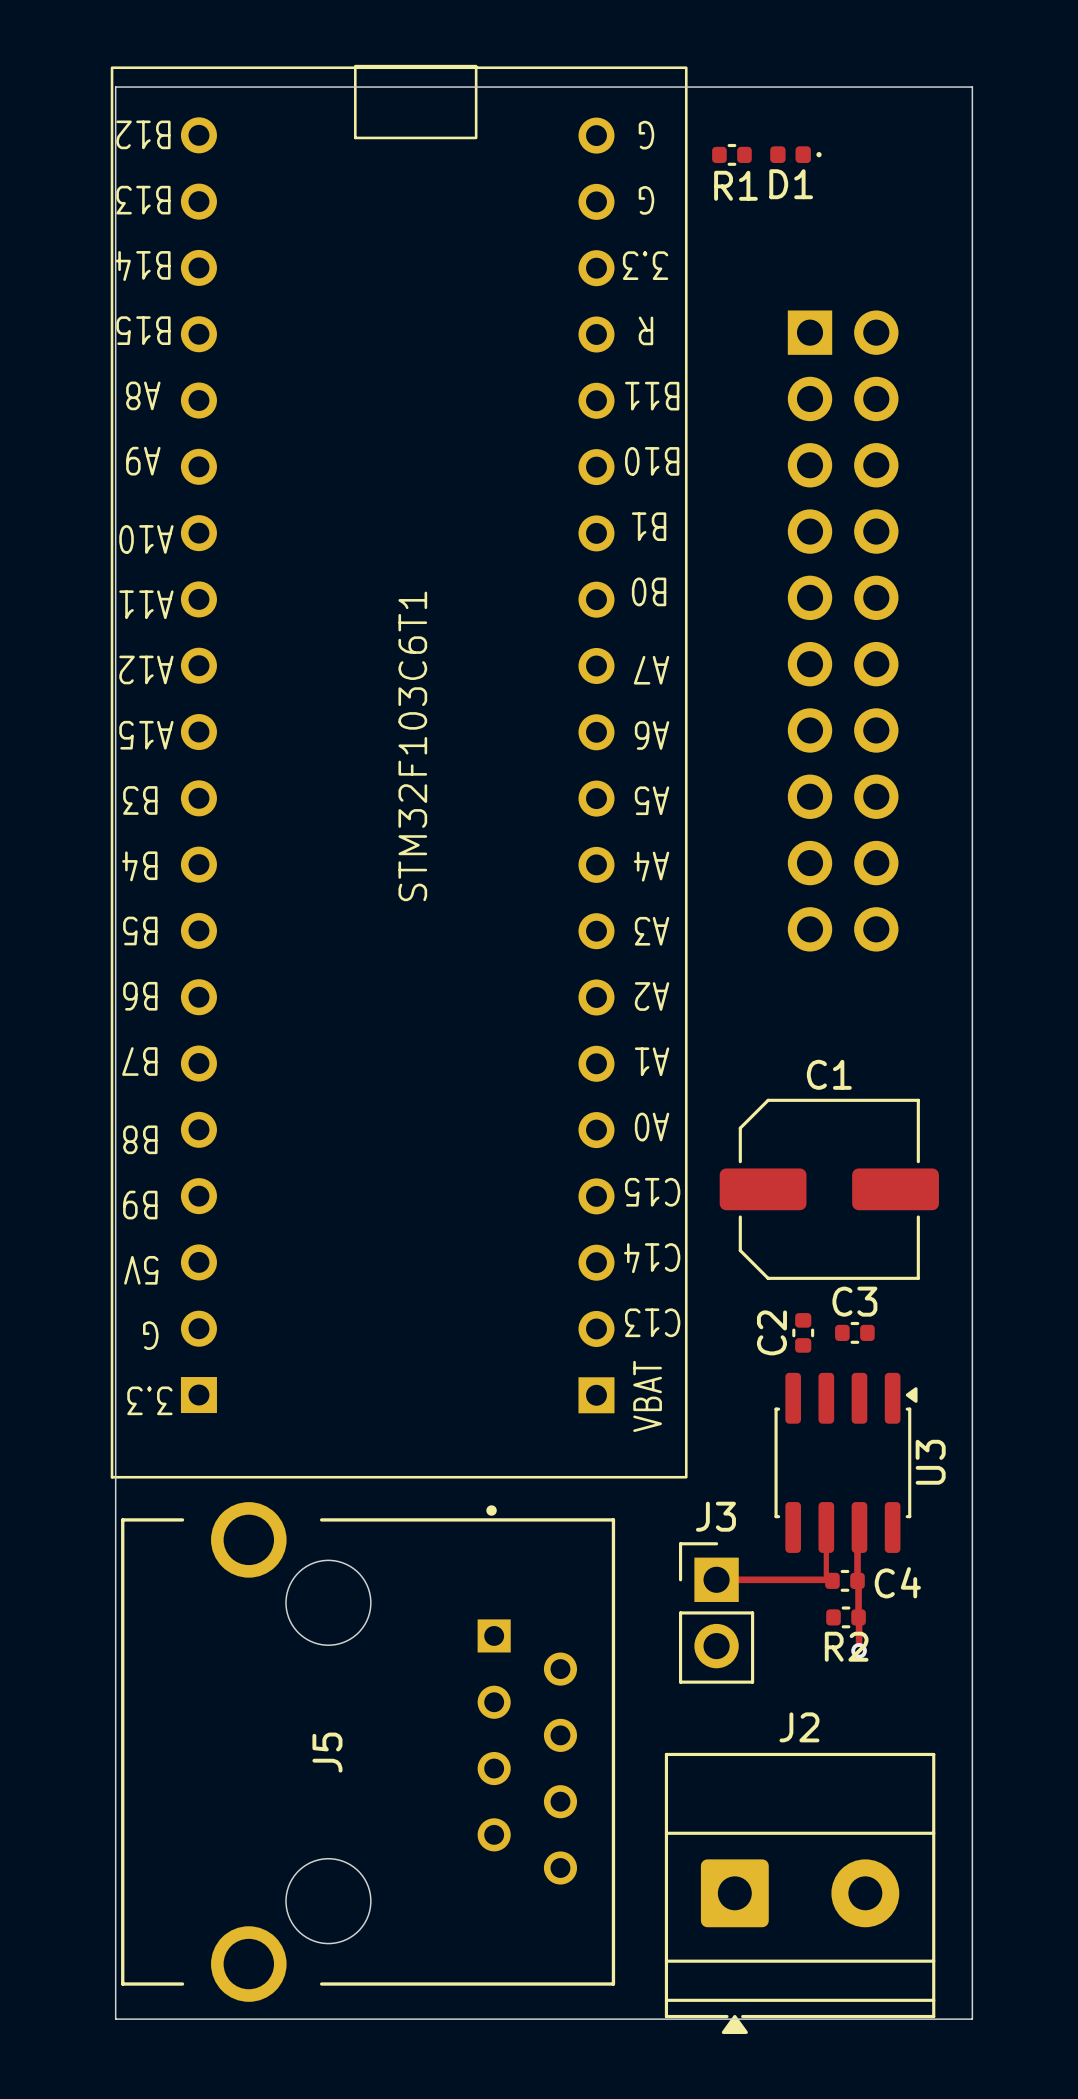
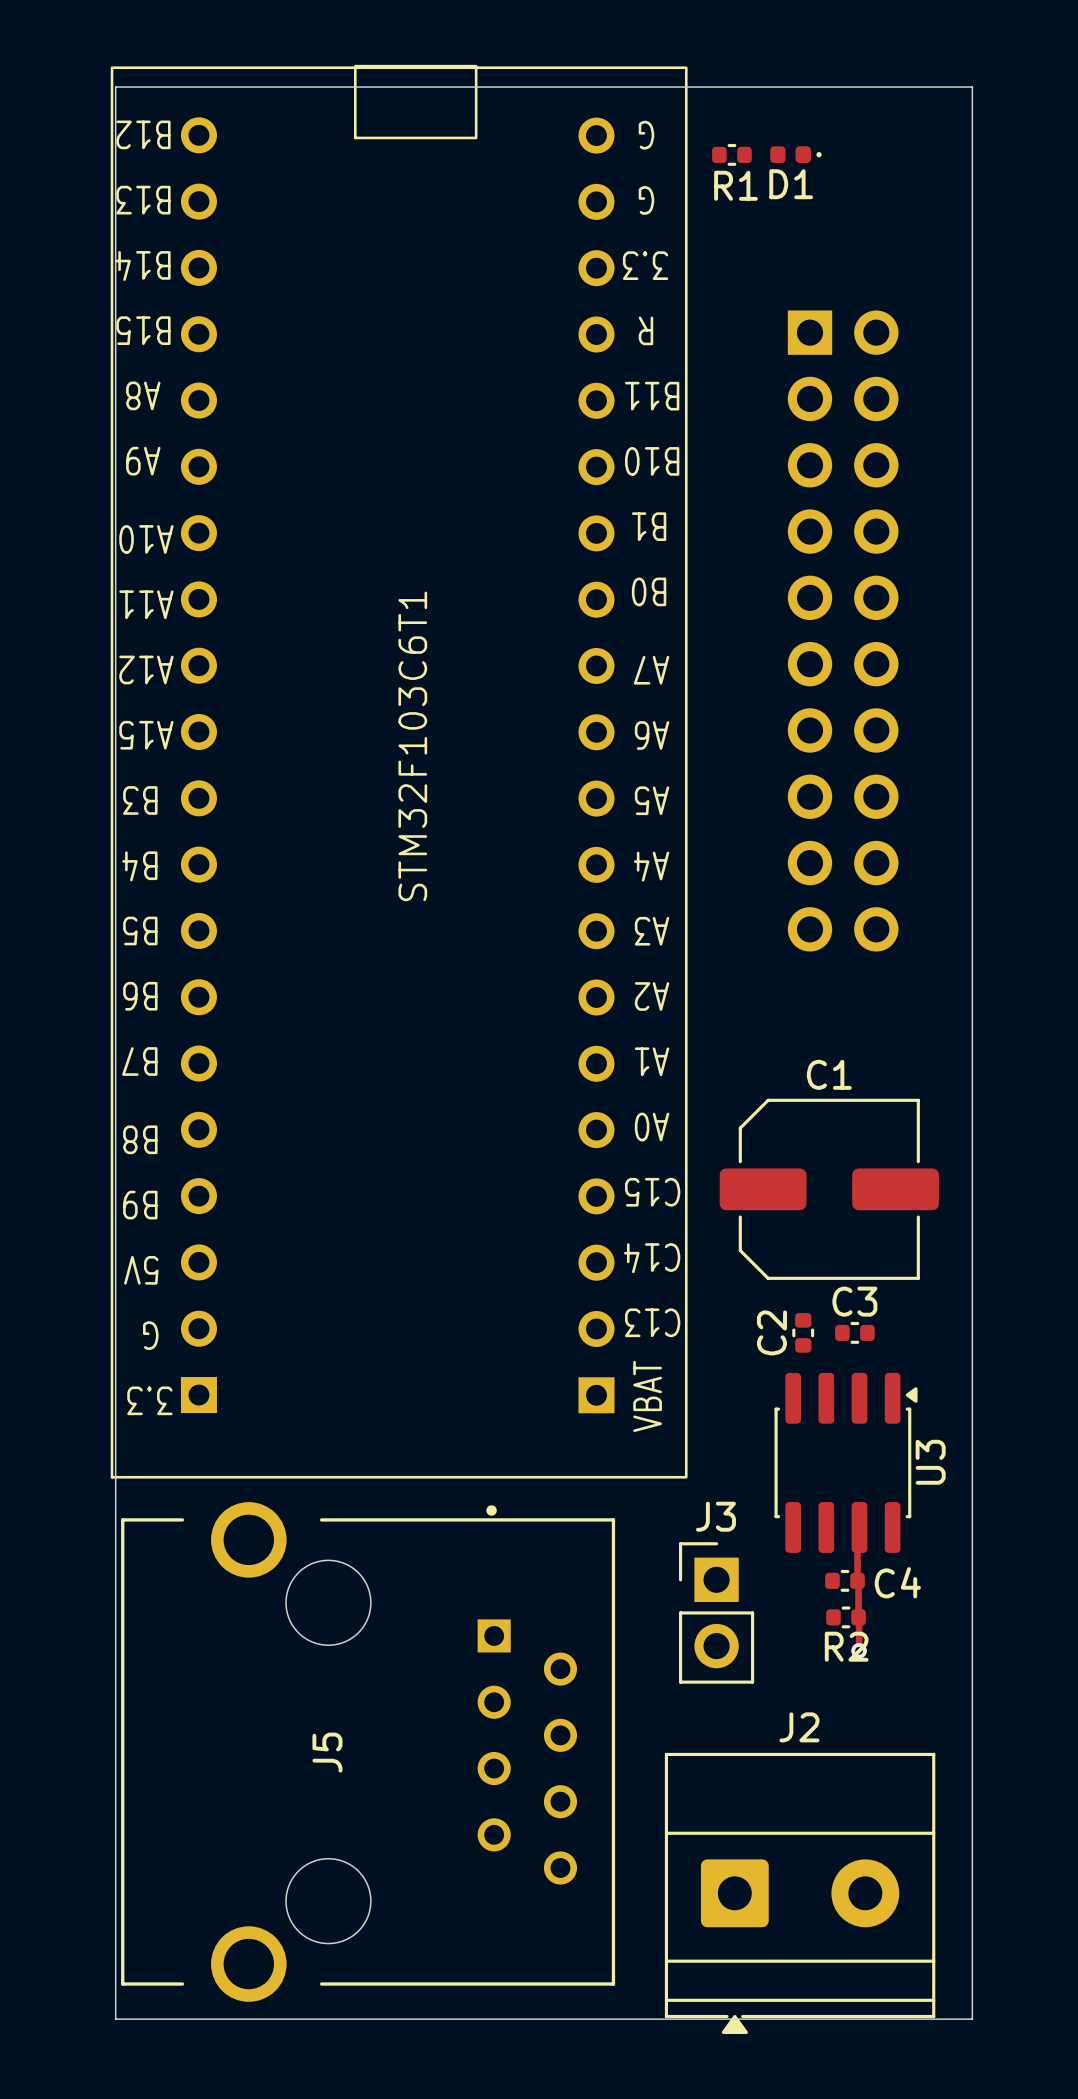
track: (826, 1527) (826, 1574) (832, 1580) (716, 1579) -> none

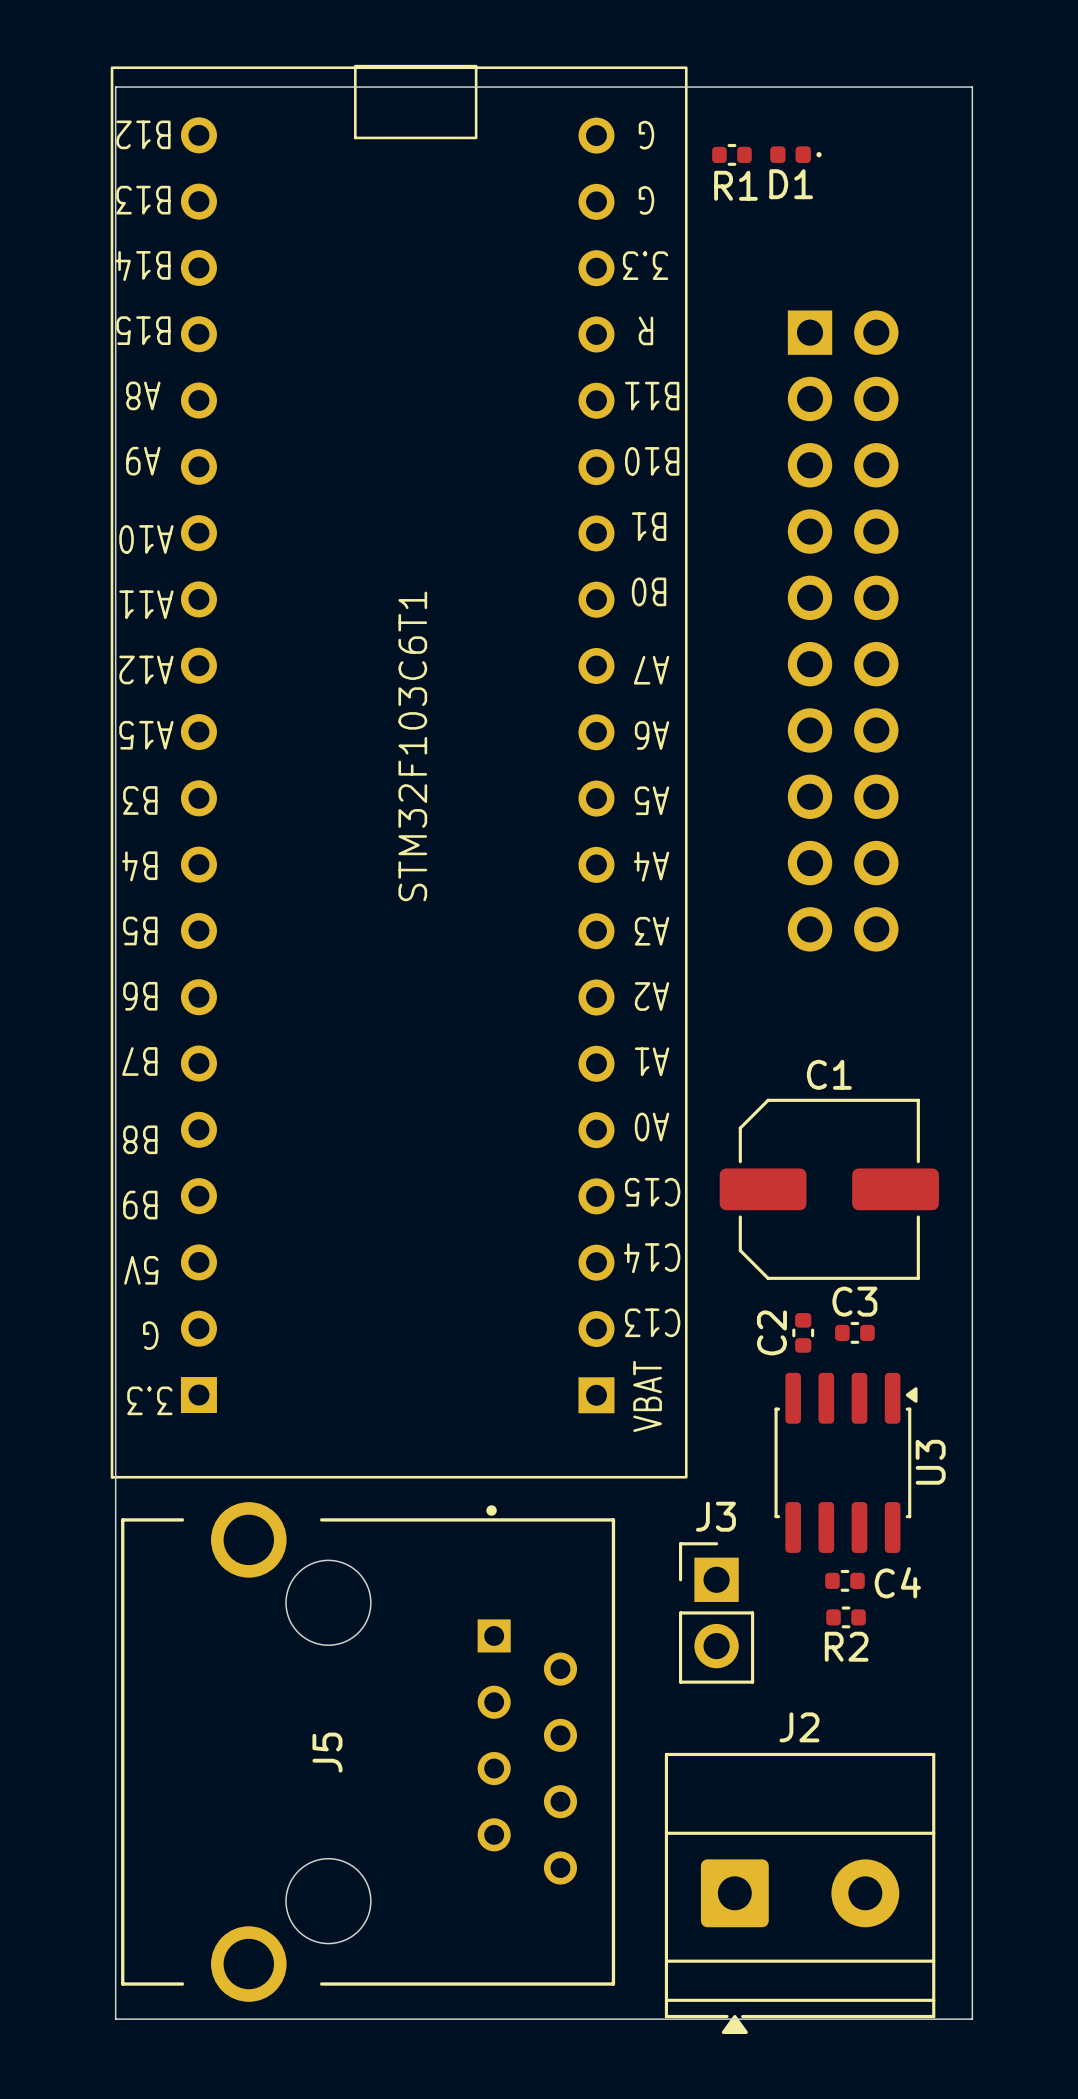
track: (859, 1527) (857, 1529) (859, 1650) -> none
via: (859, 1650) -> none

